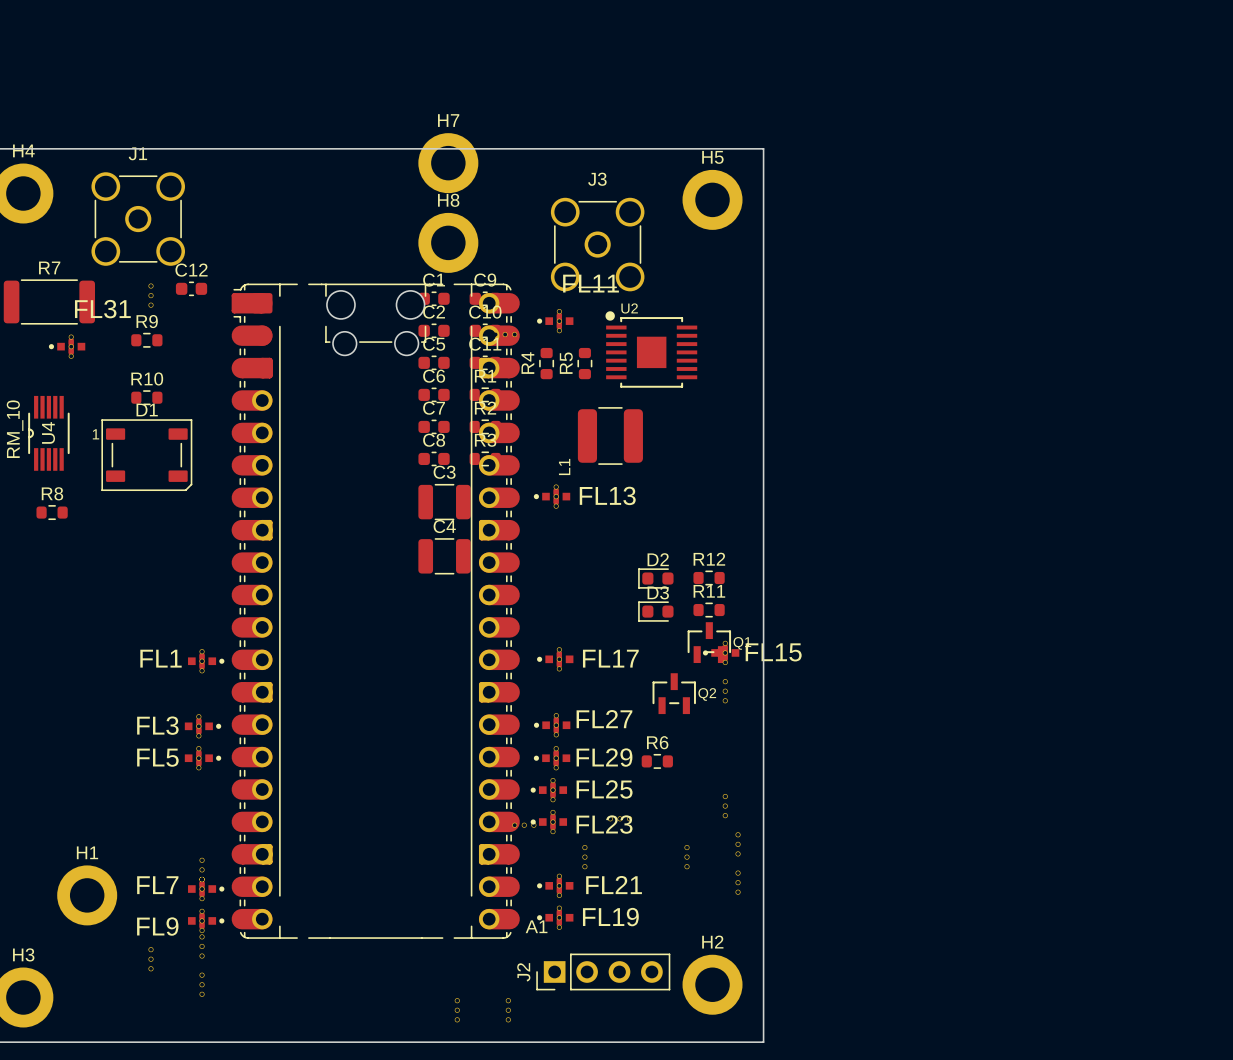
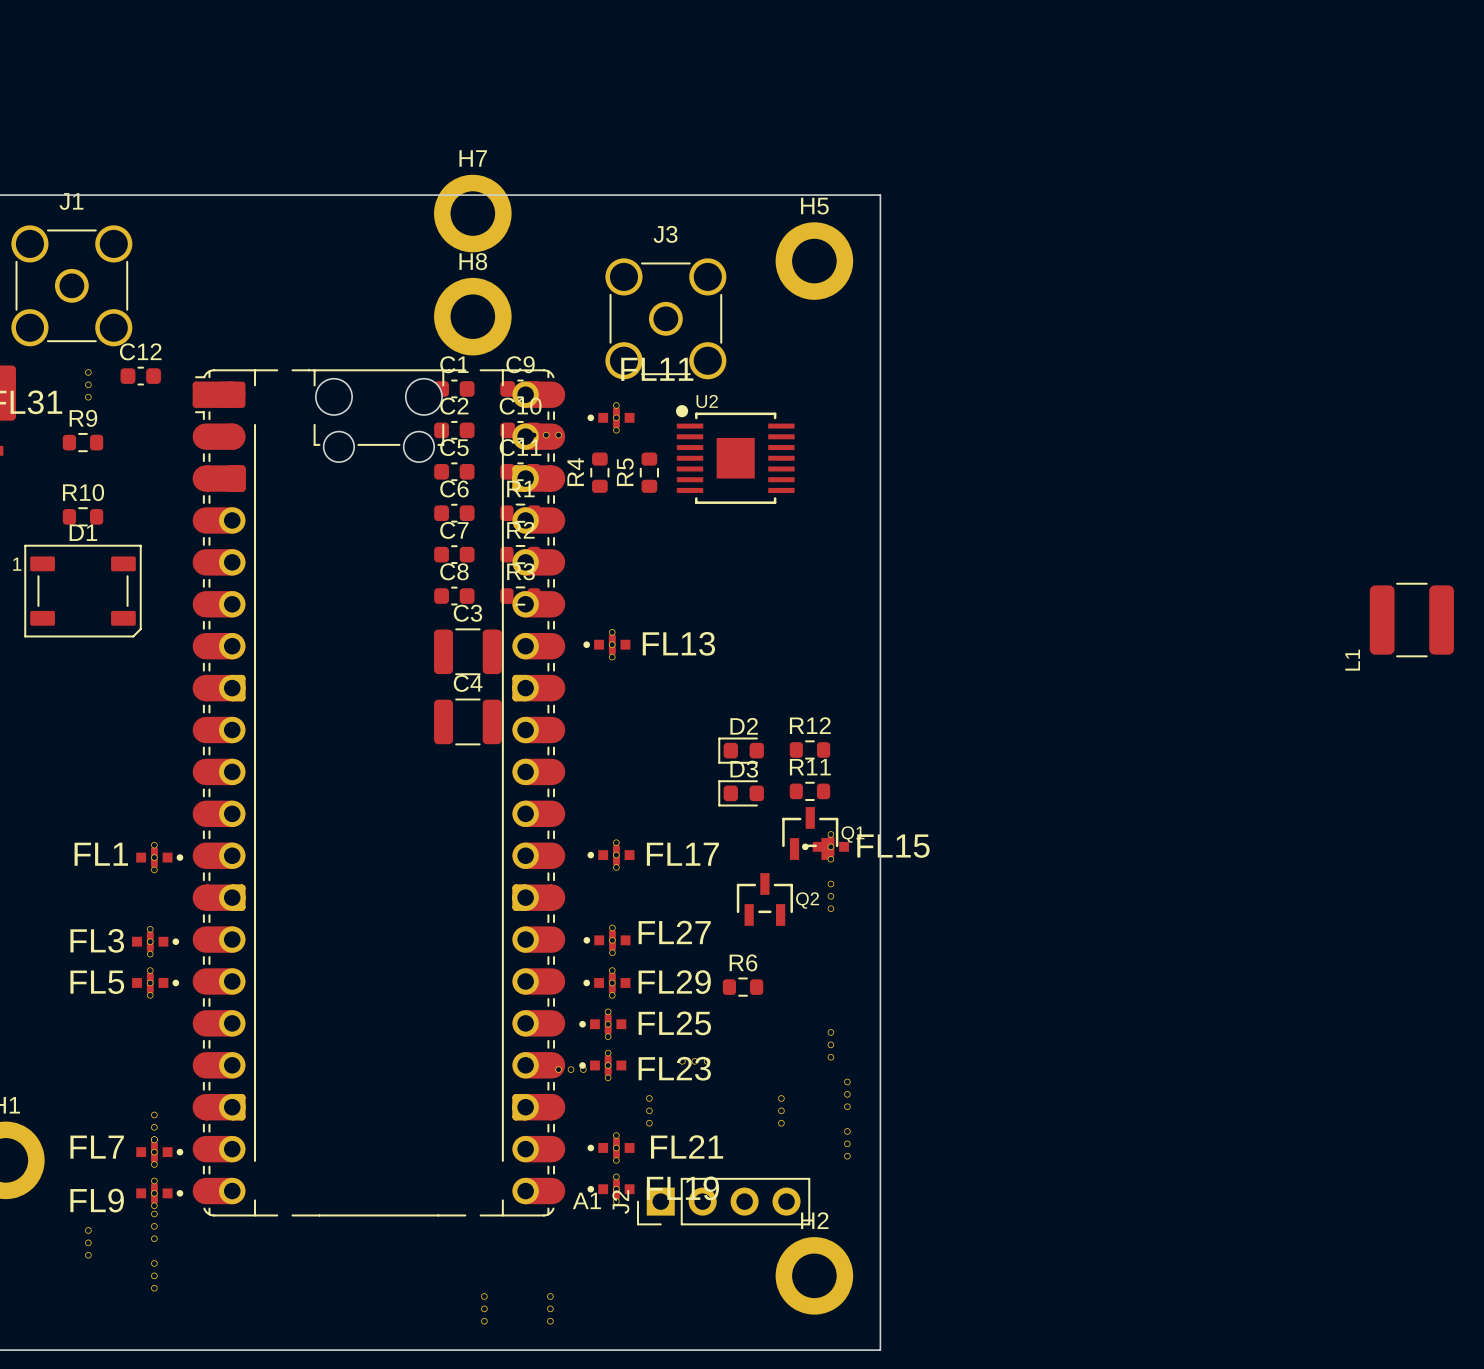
L1 position: (610, 435) -> (1411, 620)
J2 position: (603, 971) -> (723, 1201)

